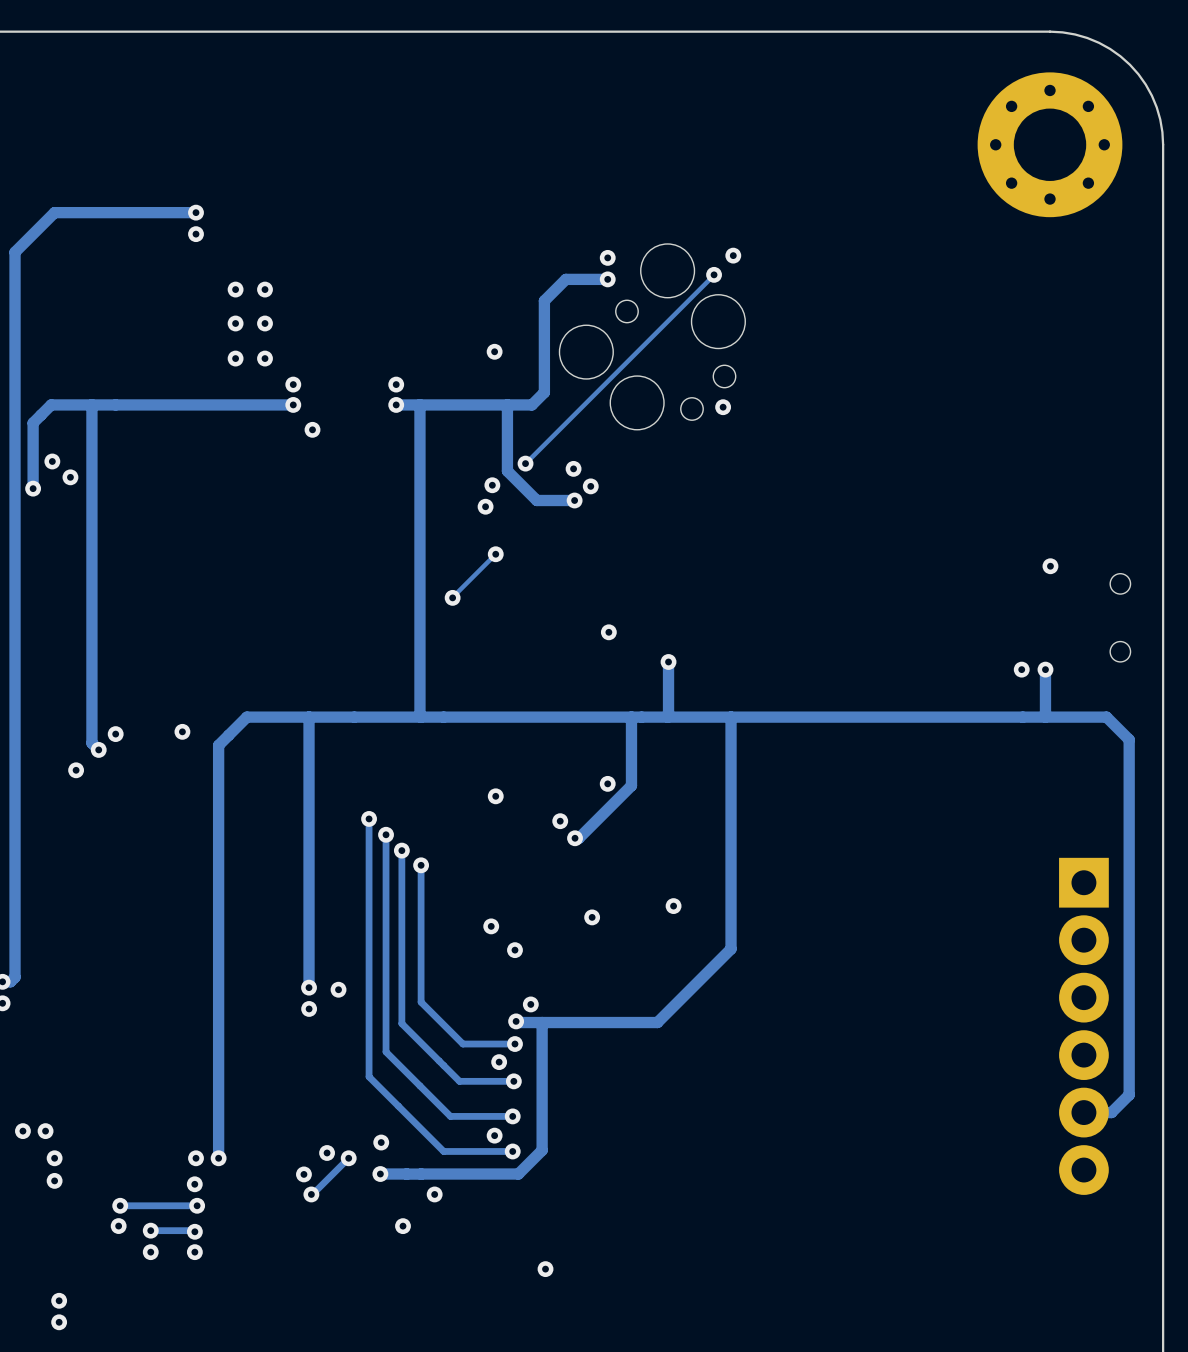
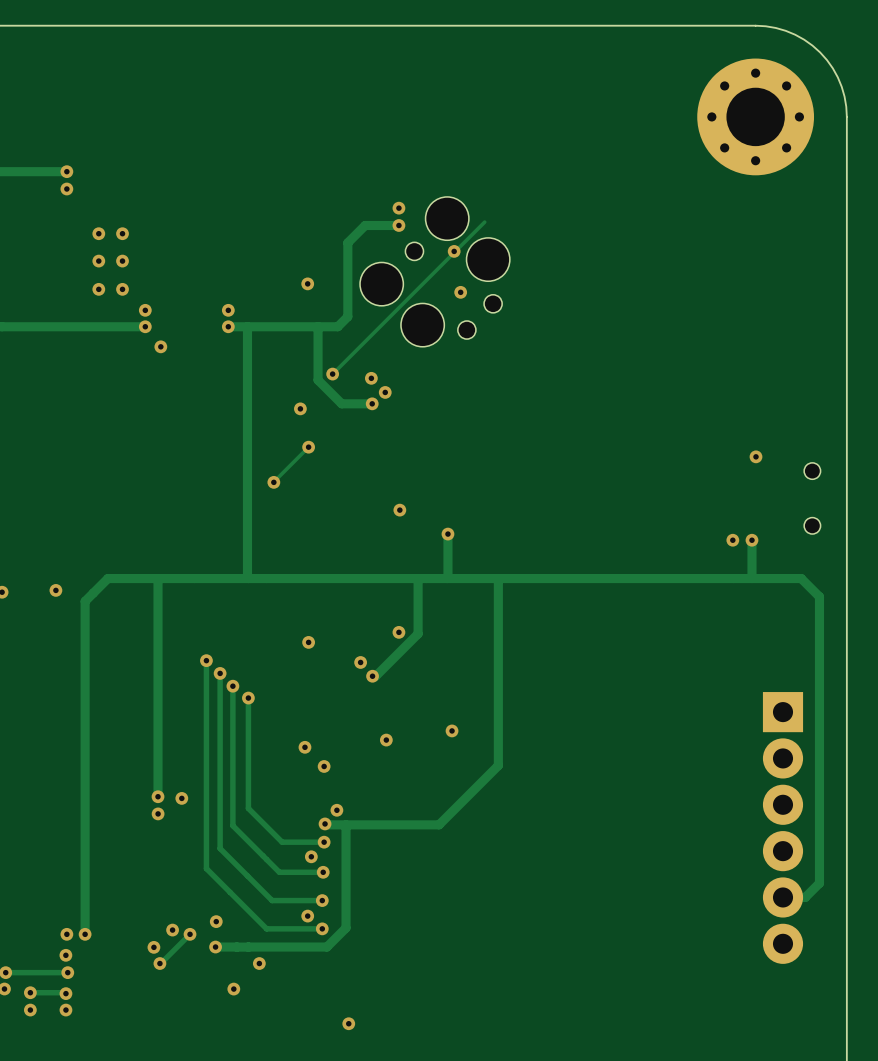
via: (733, 255) -> none
via: (714, 274) -> none
via: none -> (454, 251)
via: none -> (460, 292)
via: (723, 407) -> none
via: (492, 485) -> none

